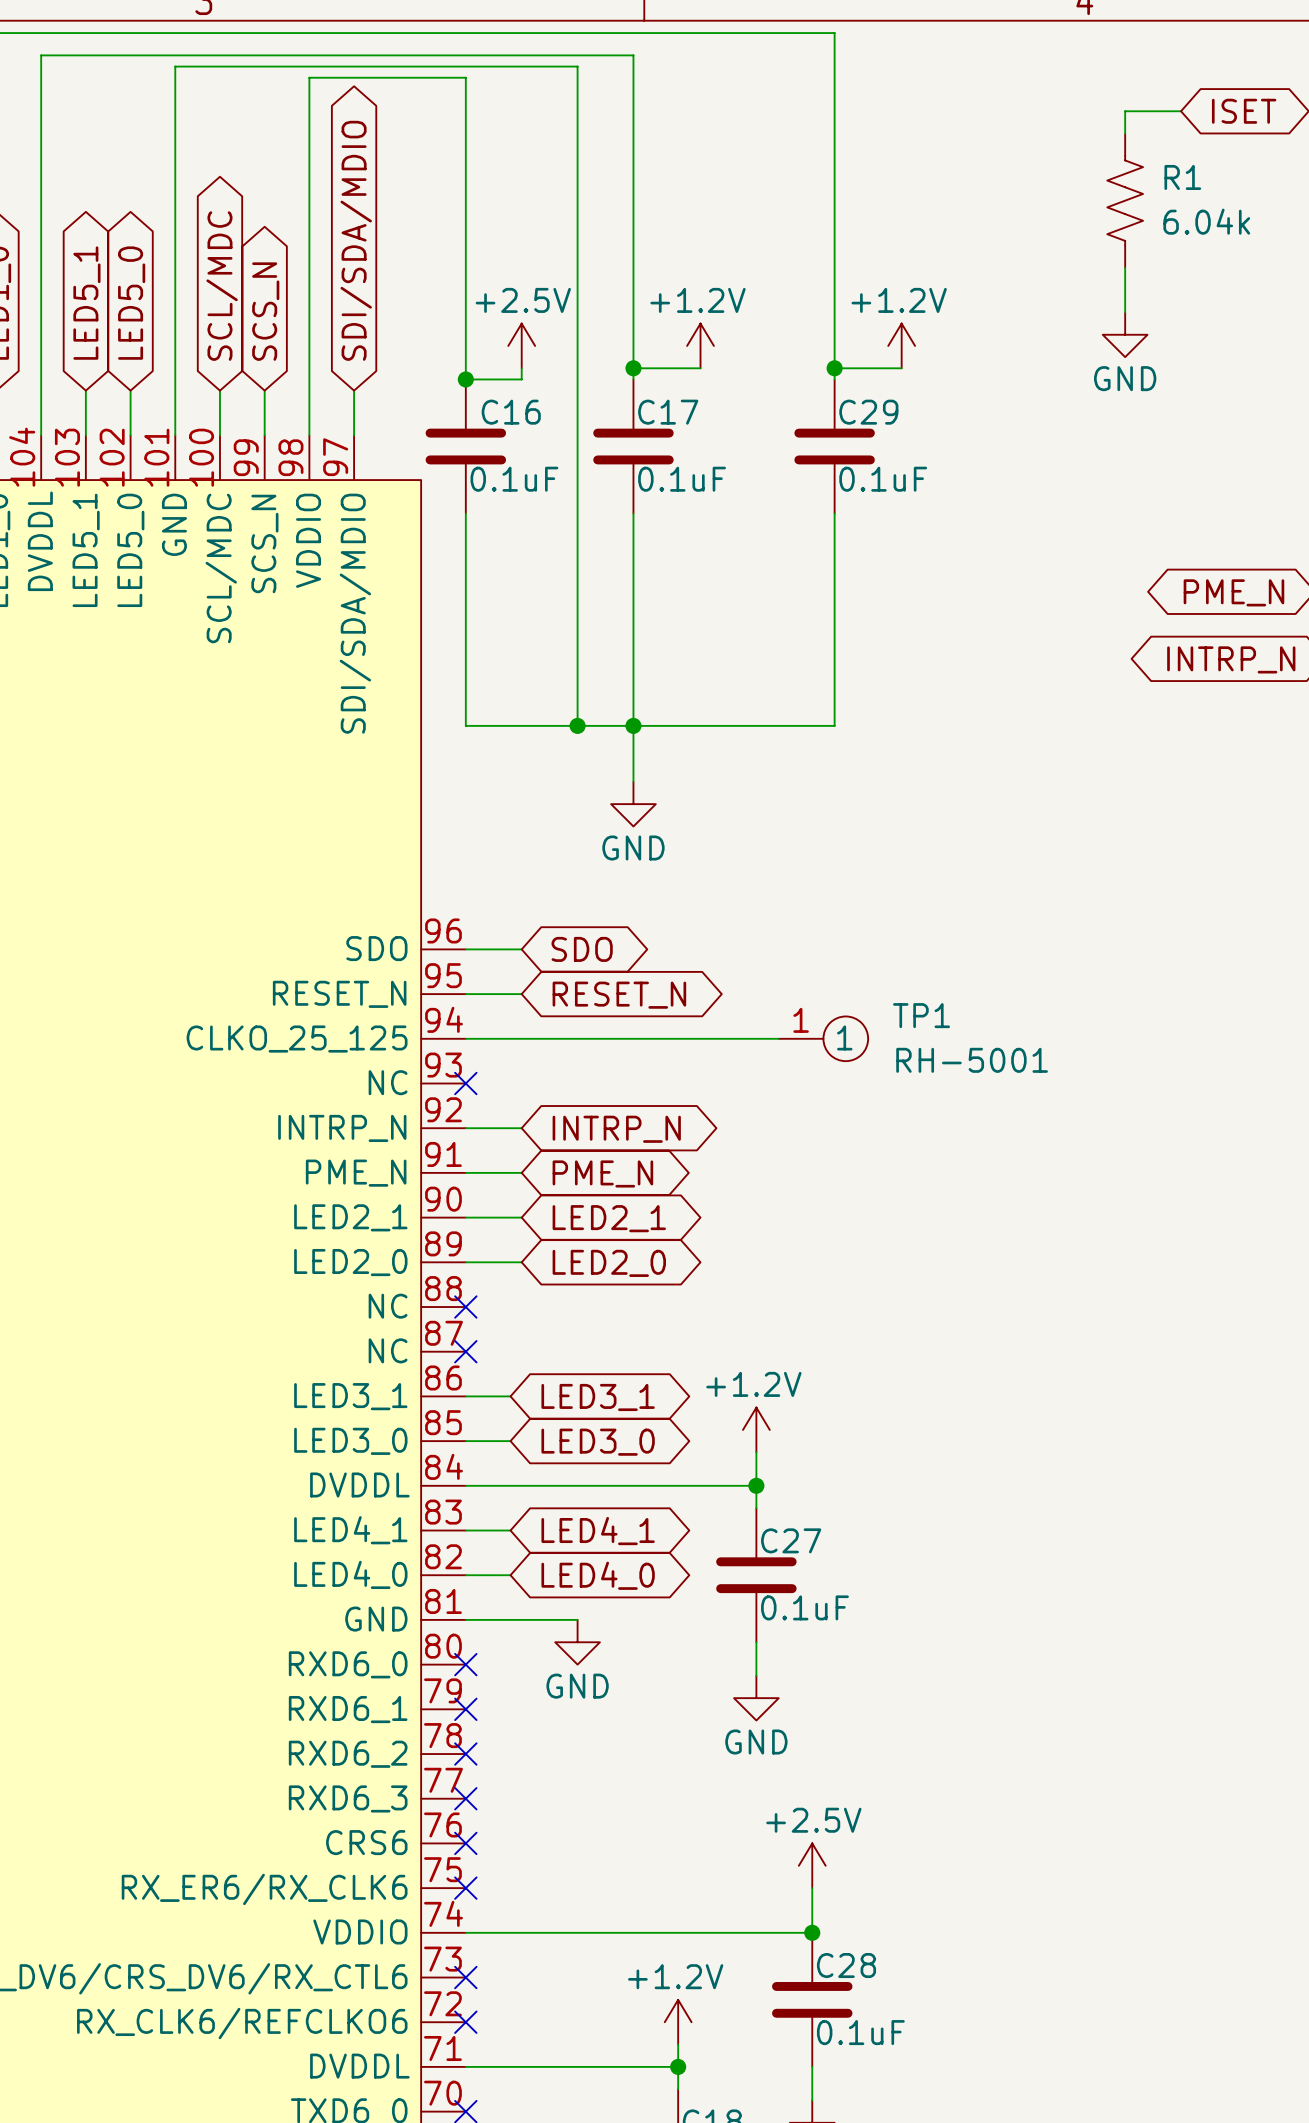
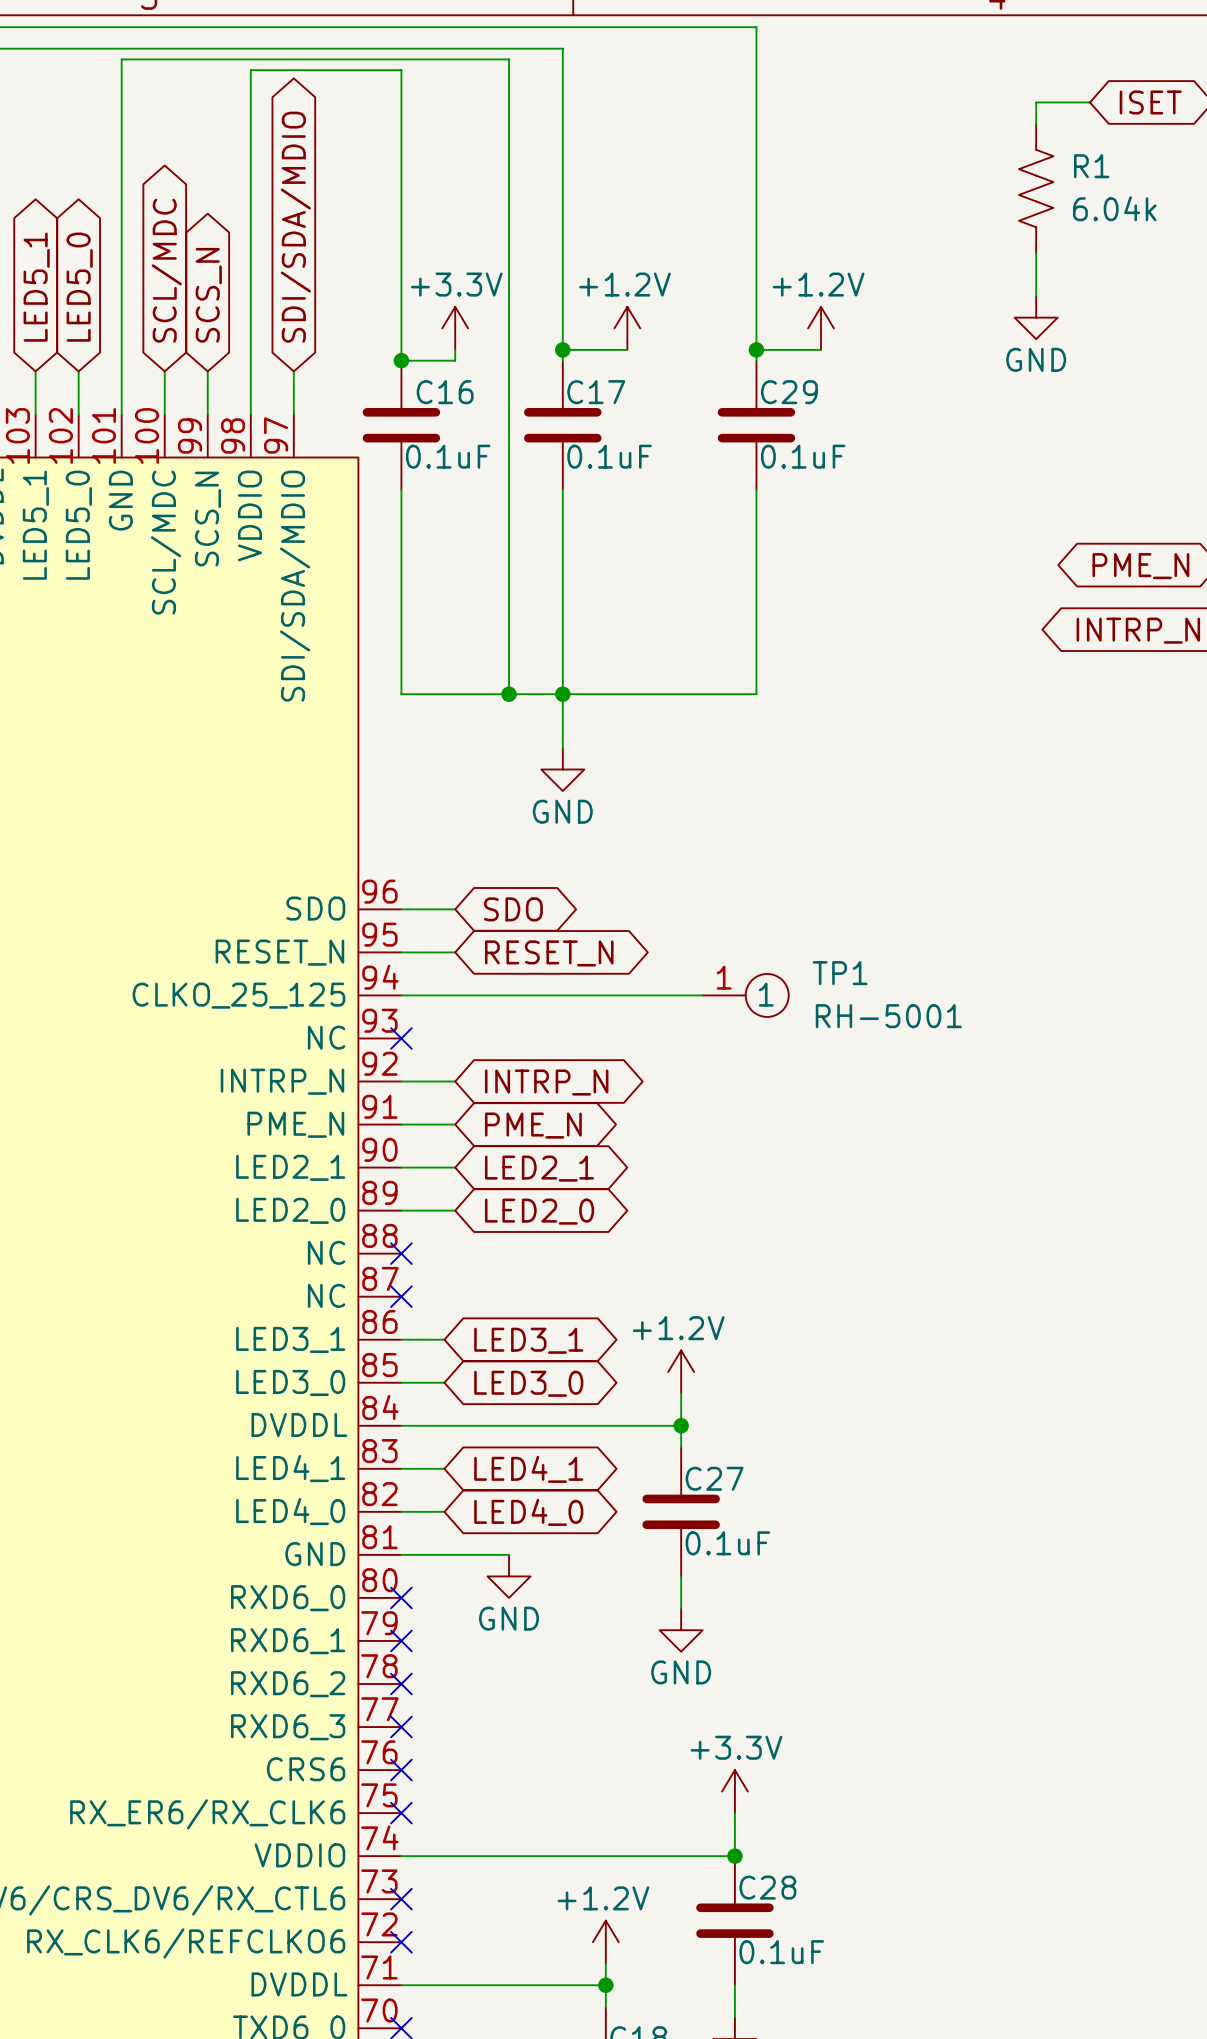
power symbol: +2.5V (521, 345) -> +3.3V (455, 328)
power symbol: +2.5V (812, 1865) -> +3.3V (734, 1791)

